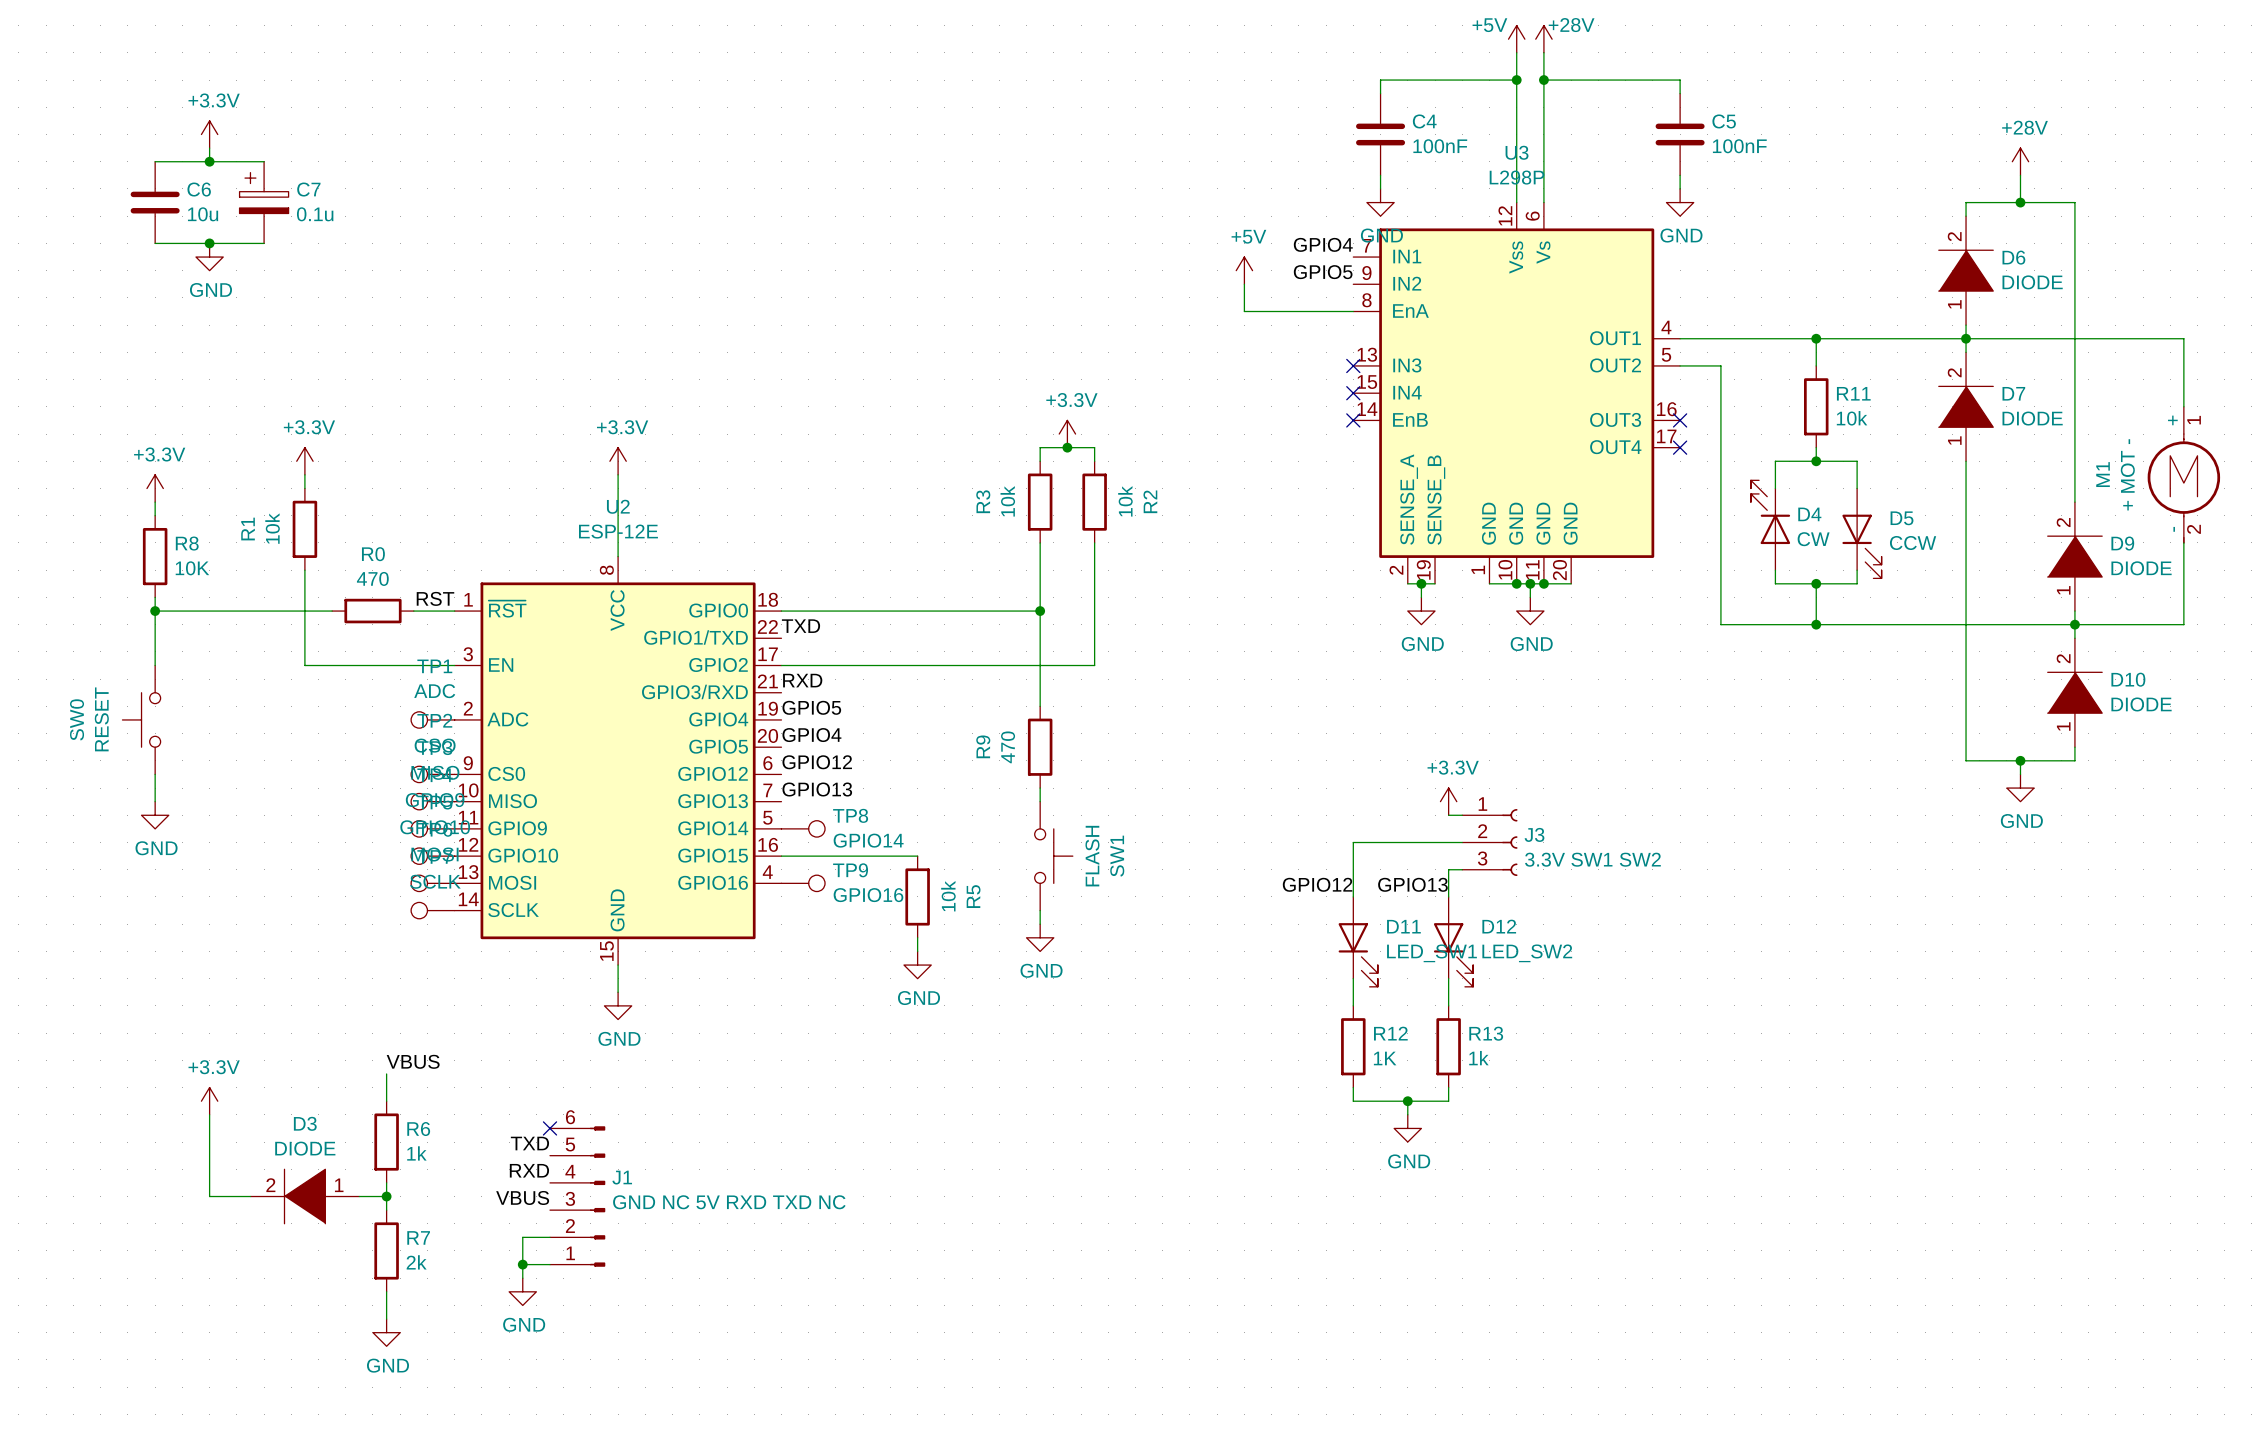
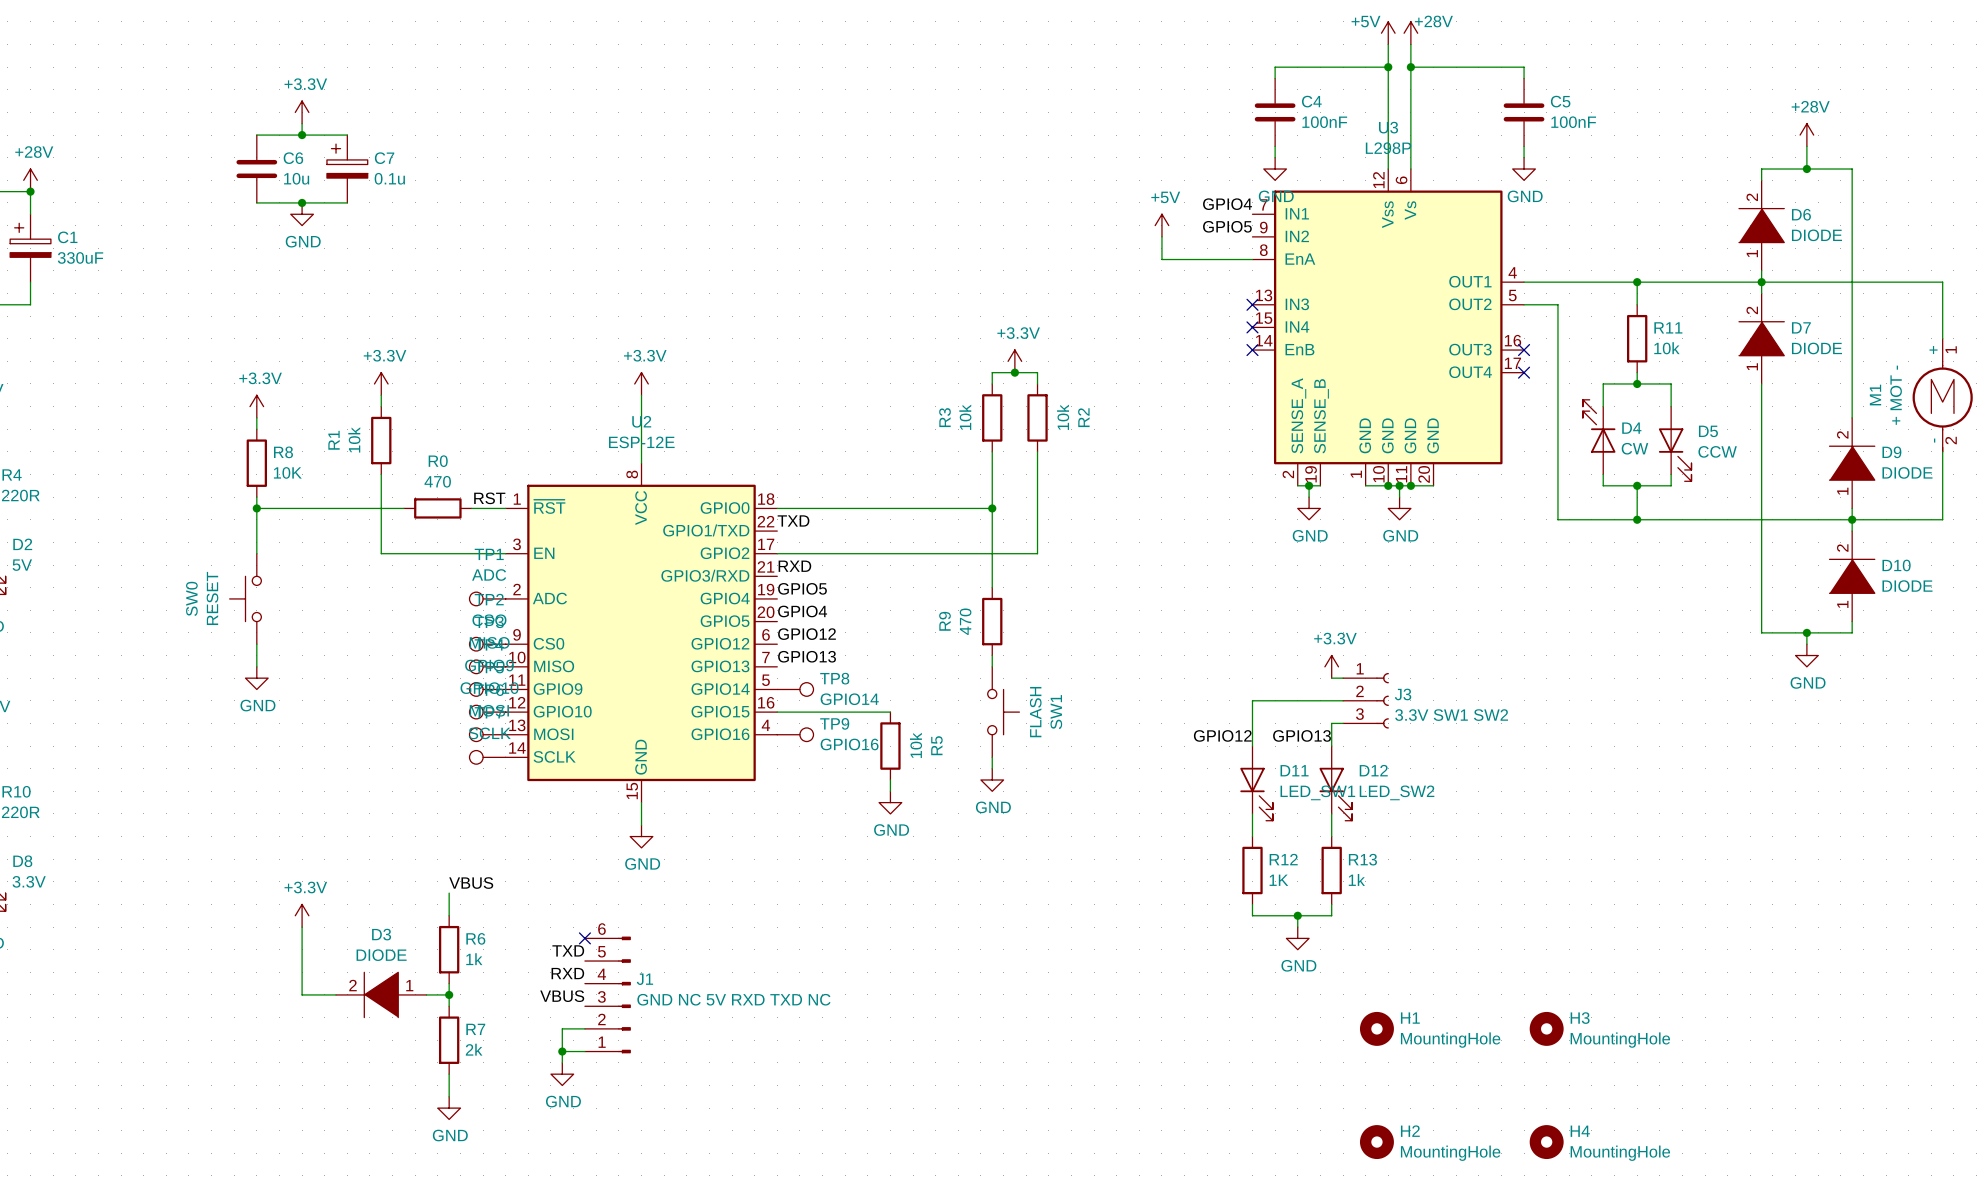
H1: none -> MountingHole (1376, 1028)
H3: none -> MountingHole (1546, 1028)
H2: none -> MountingHole (1376, 1142)
H4: none -> MountingHole (1546, 1142)

